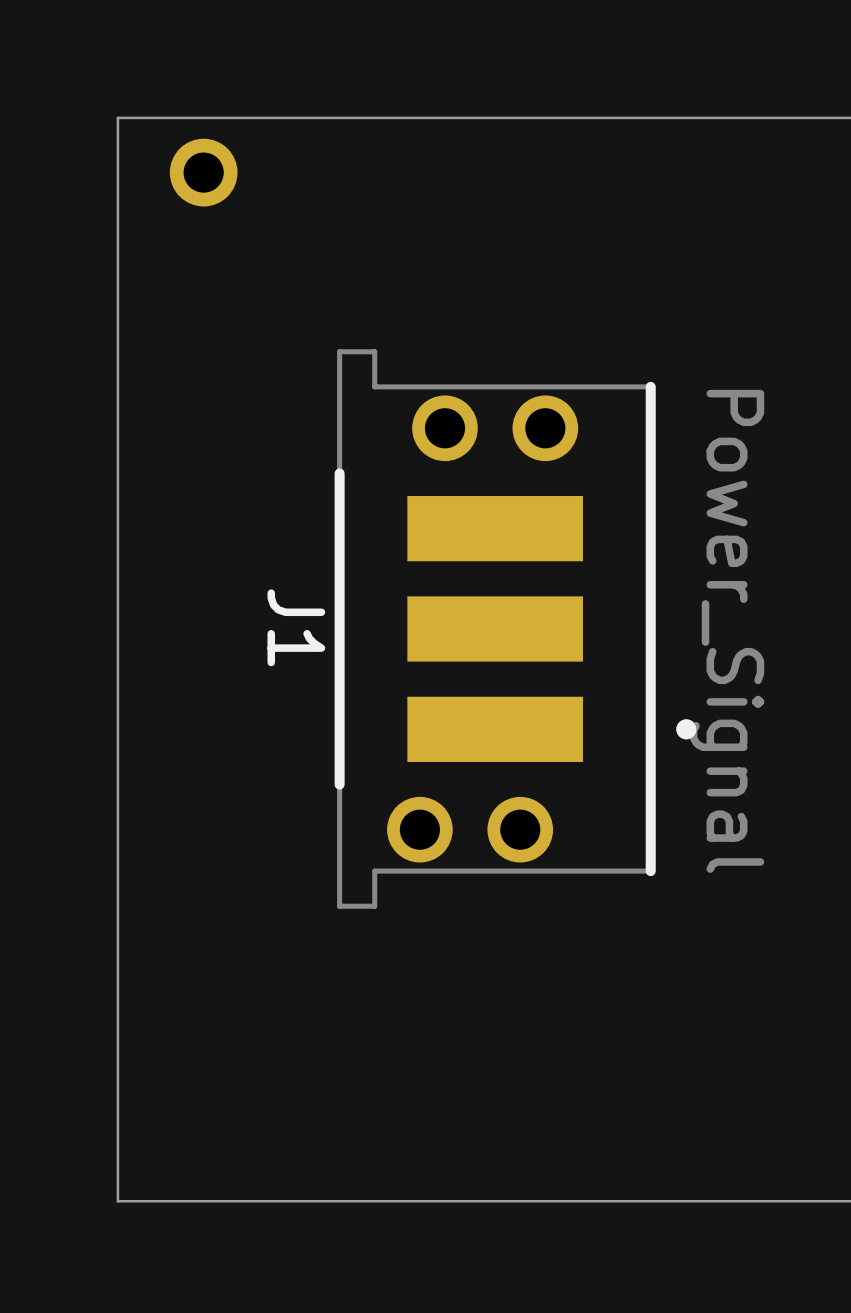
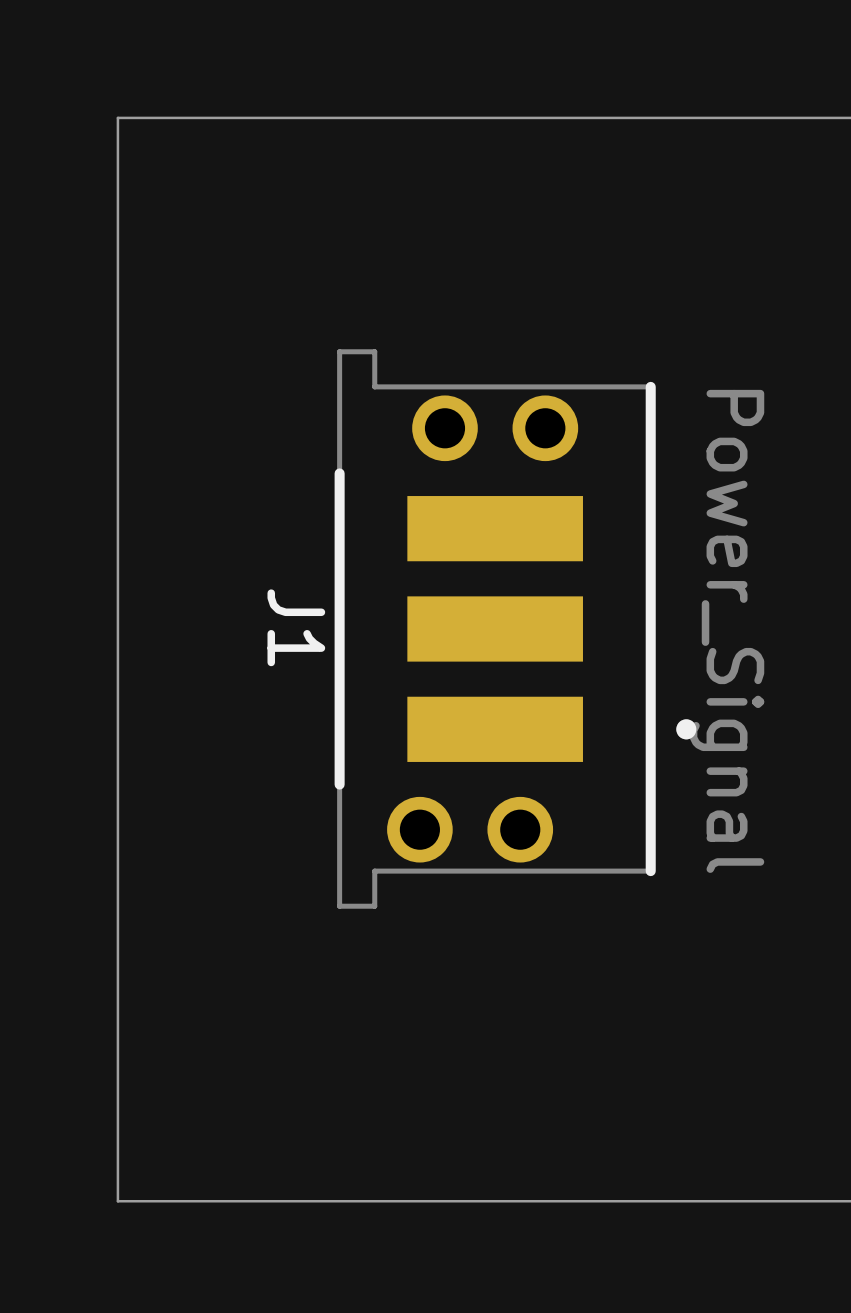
part: (203, 172) -> none

